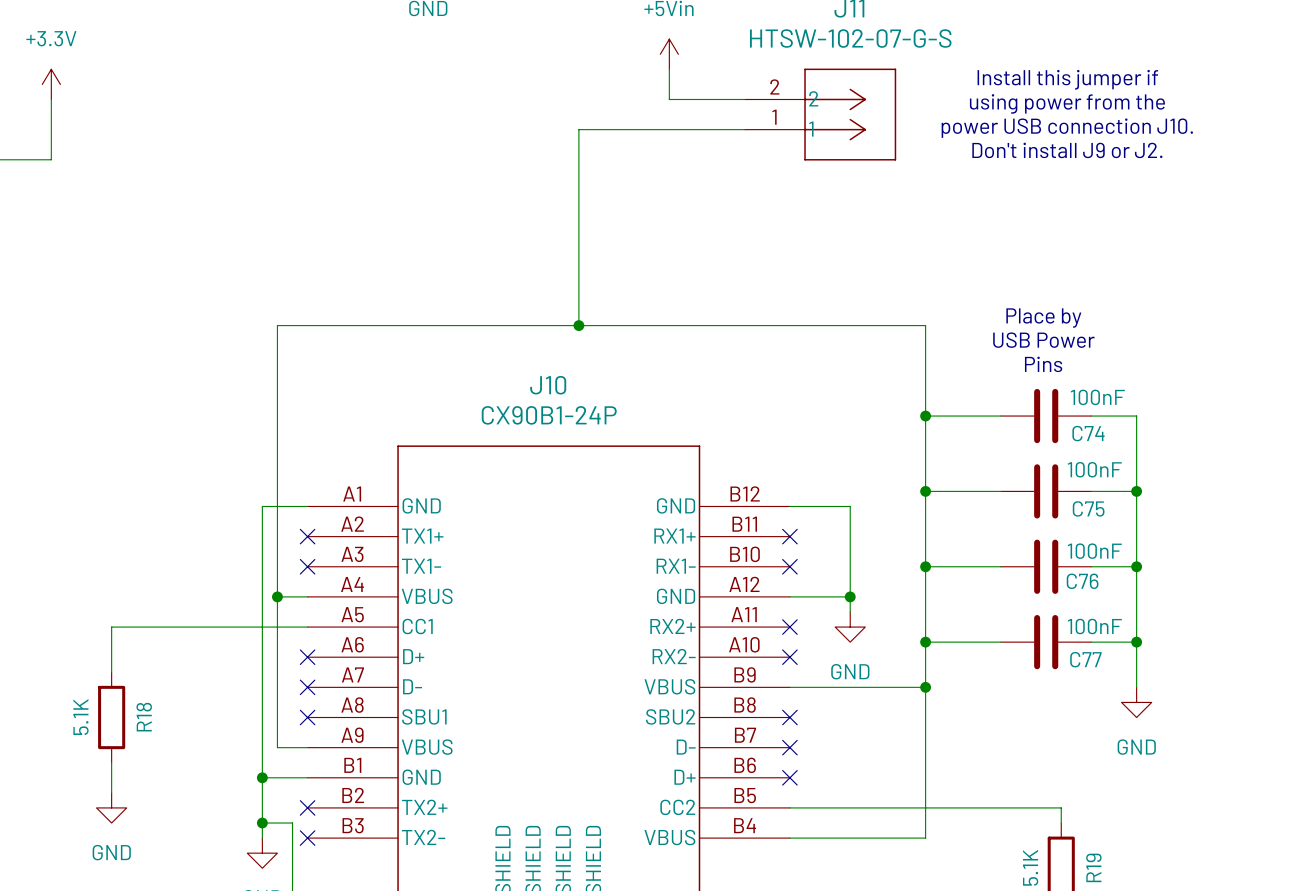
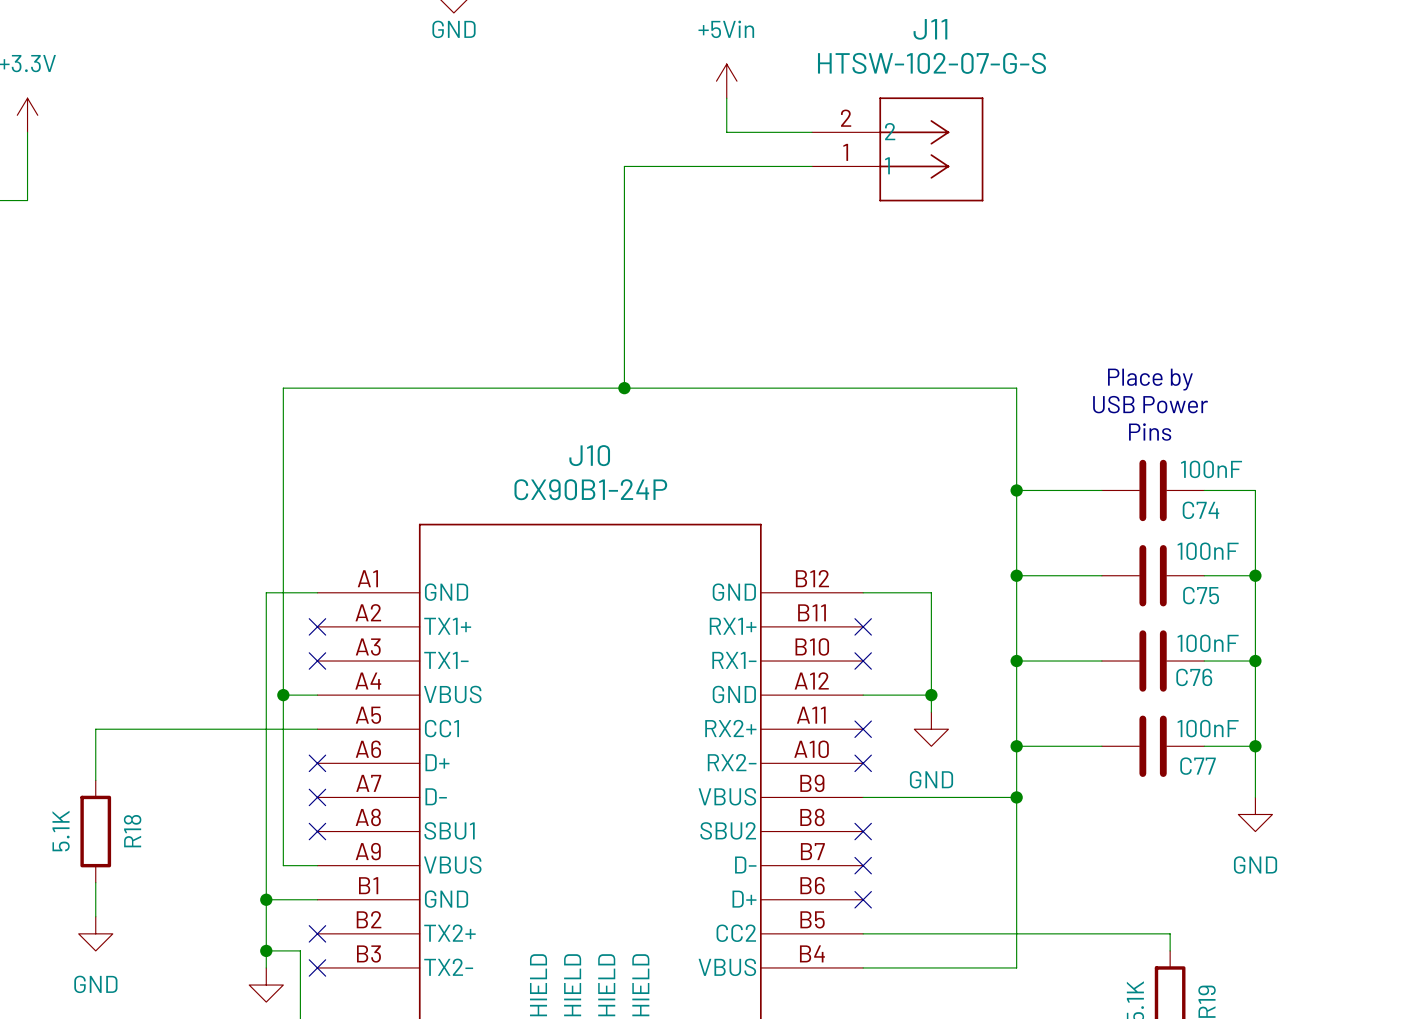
text: Install this jumper if (1067, 79) -> none
text: using power from the (1067, 103) -> none
text: power USB connection J10. (1067, 128) -> none
text: Don't install J9 or J2. (1067, 150) -> none

